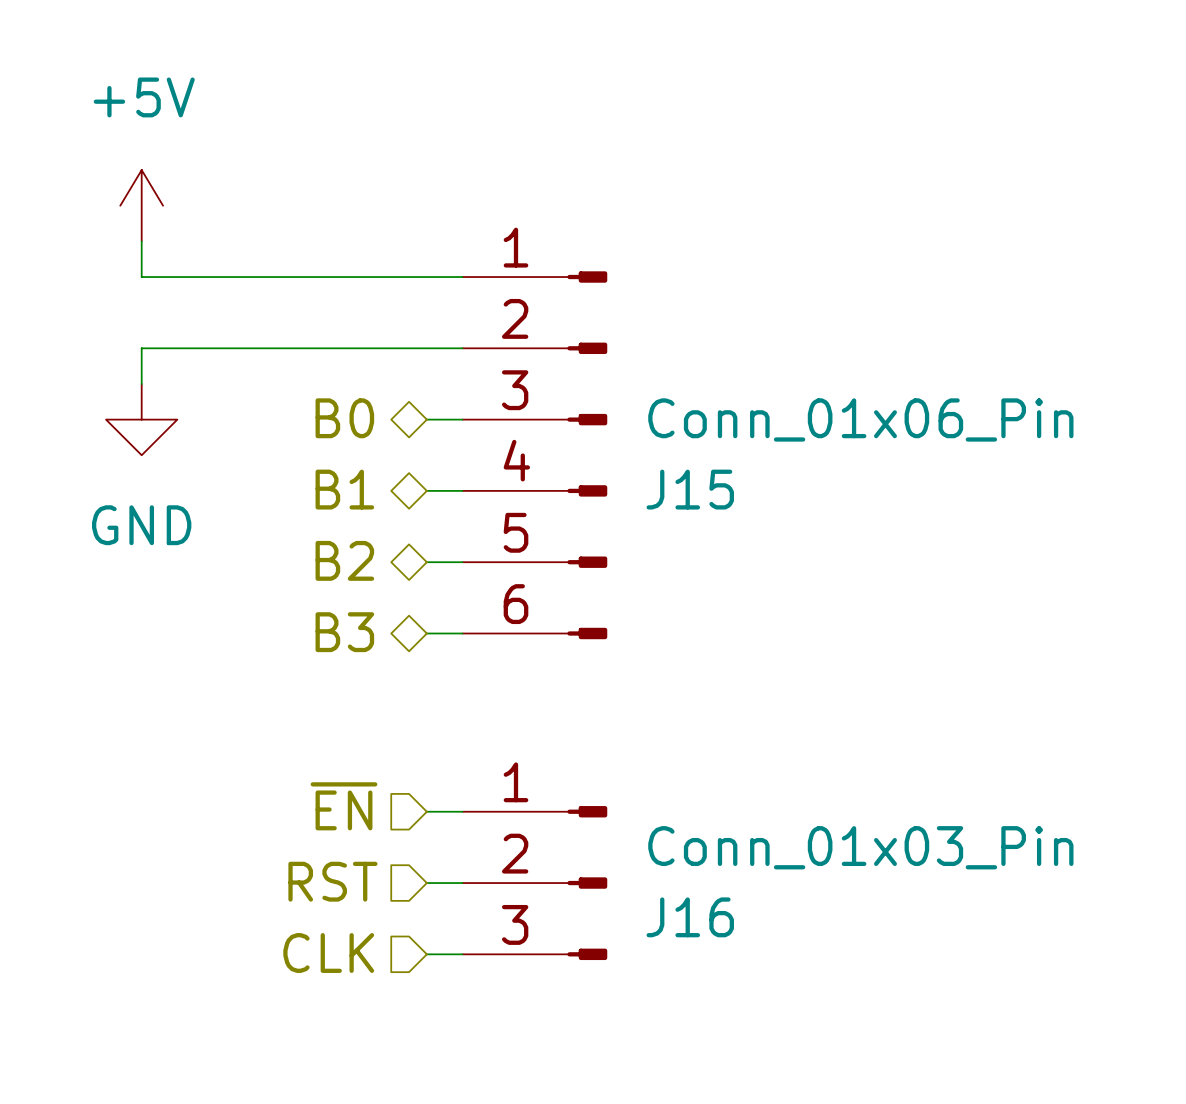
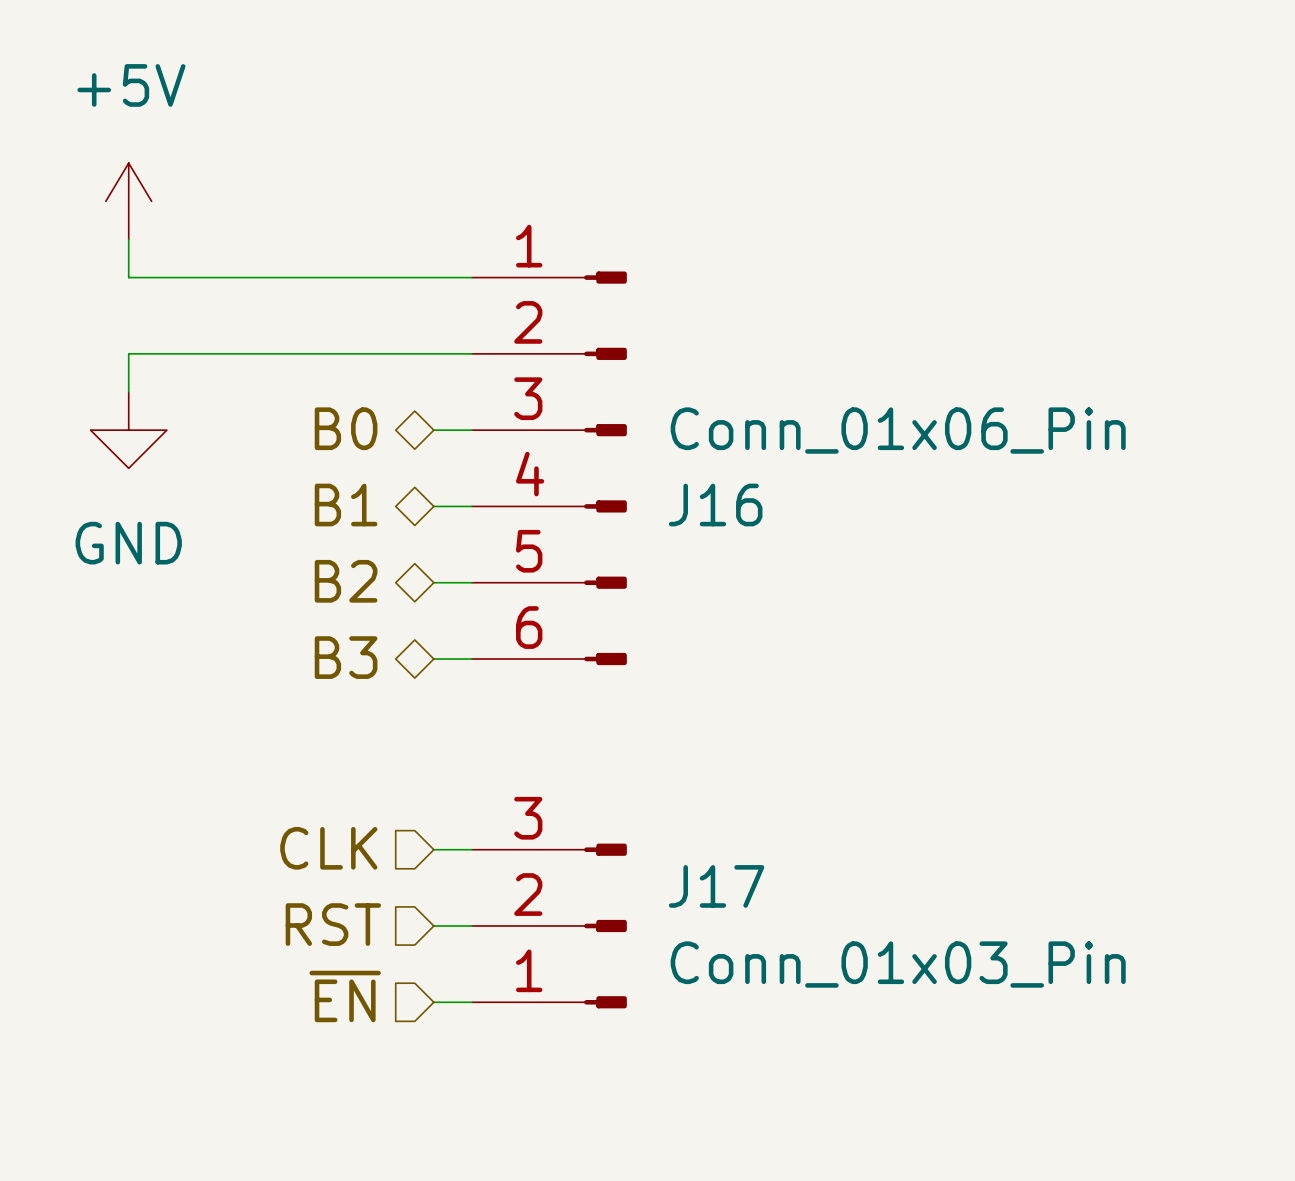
J15 name: J15 (690, 489) -> J16 (715, 505)
hierarchical label: ~{EN} (343, 806) -> CLK (328, 848)
J16 flip: as is (587, 883) -> up-down (605, 926)
J16 name: J16 (690, 917) -> J17 (716, 886)
hierarchical label: CLK (328, 953) -> ~{EN} (345, 996)

